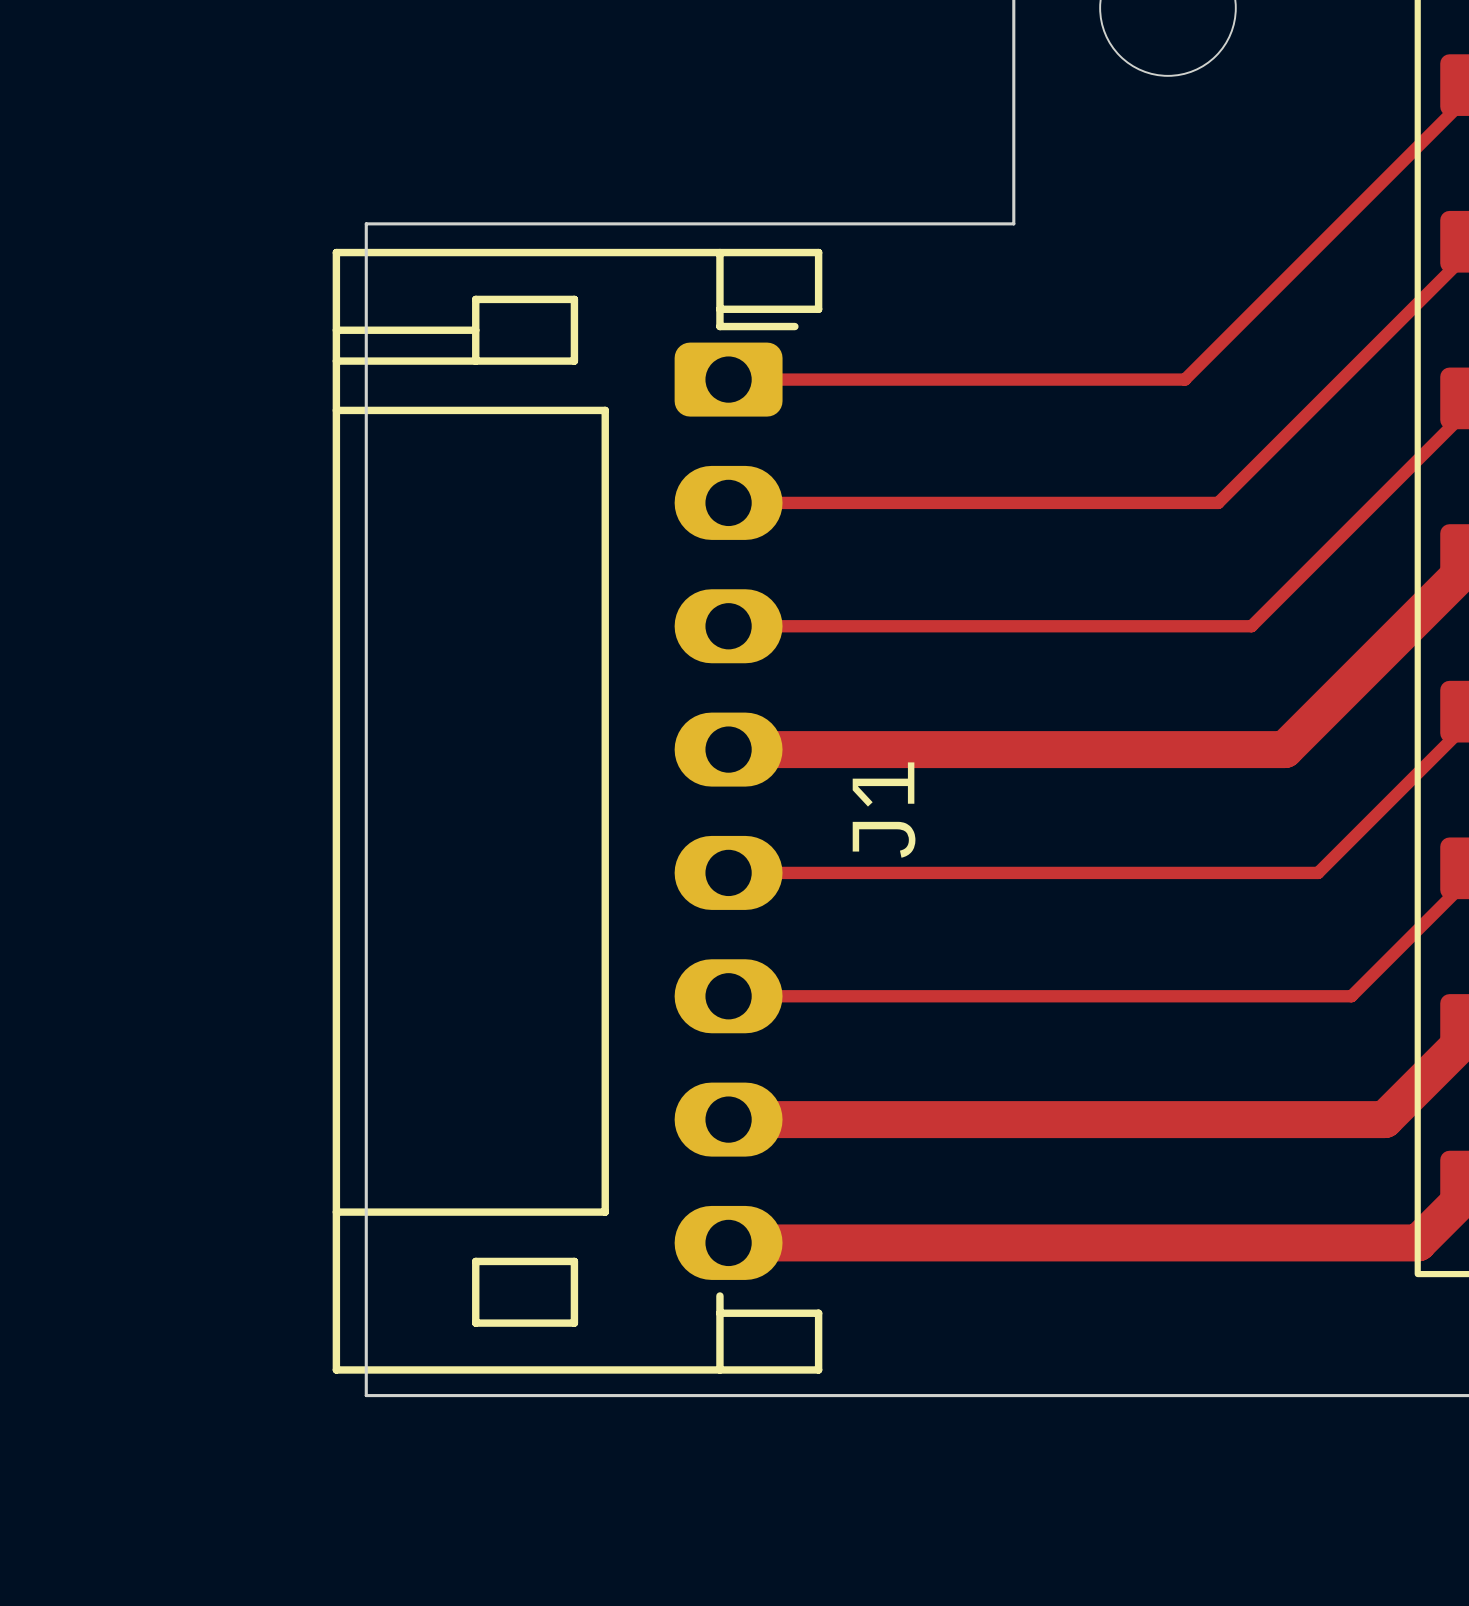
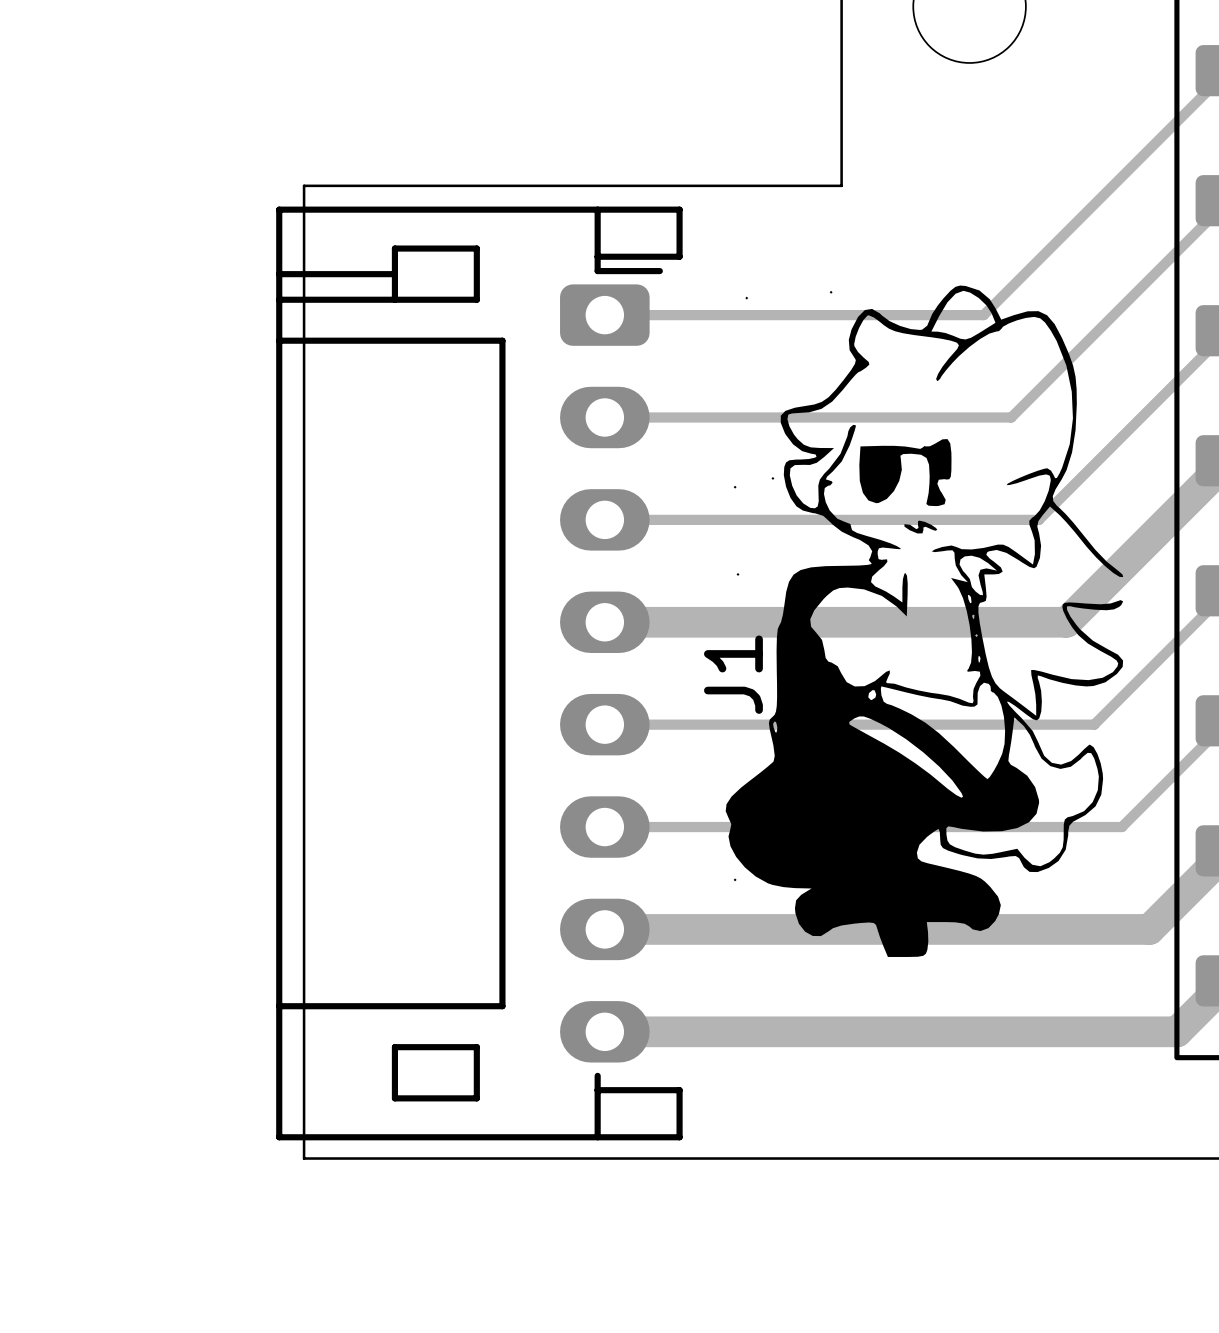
drawing: none -> [725, 285, 1124, 957]

